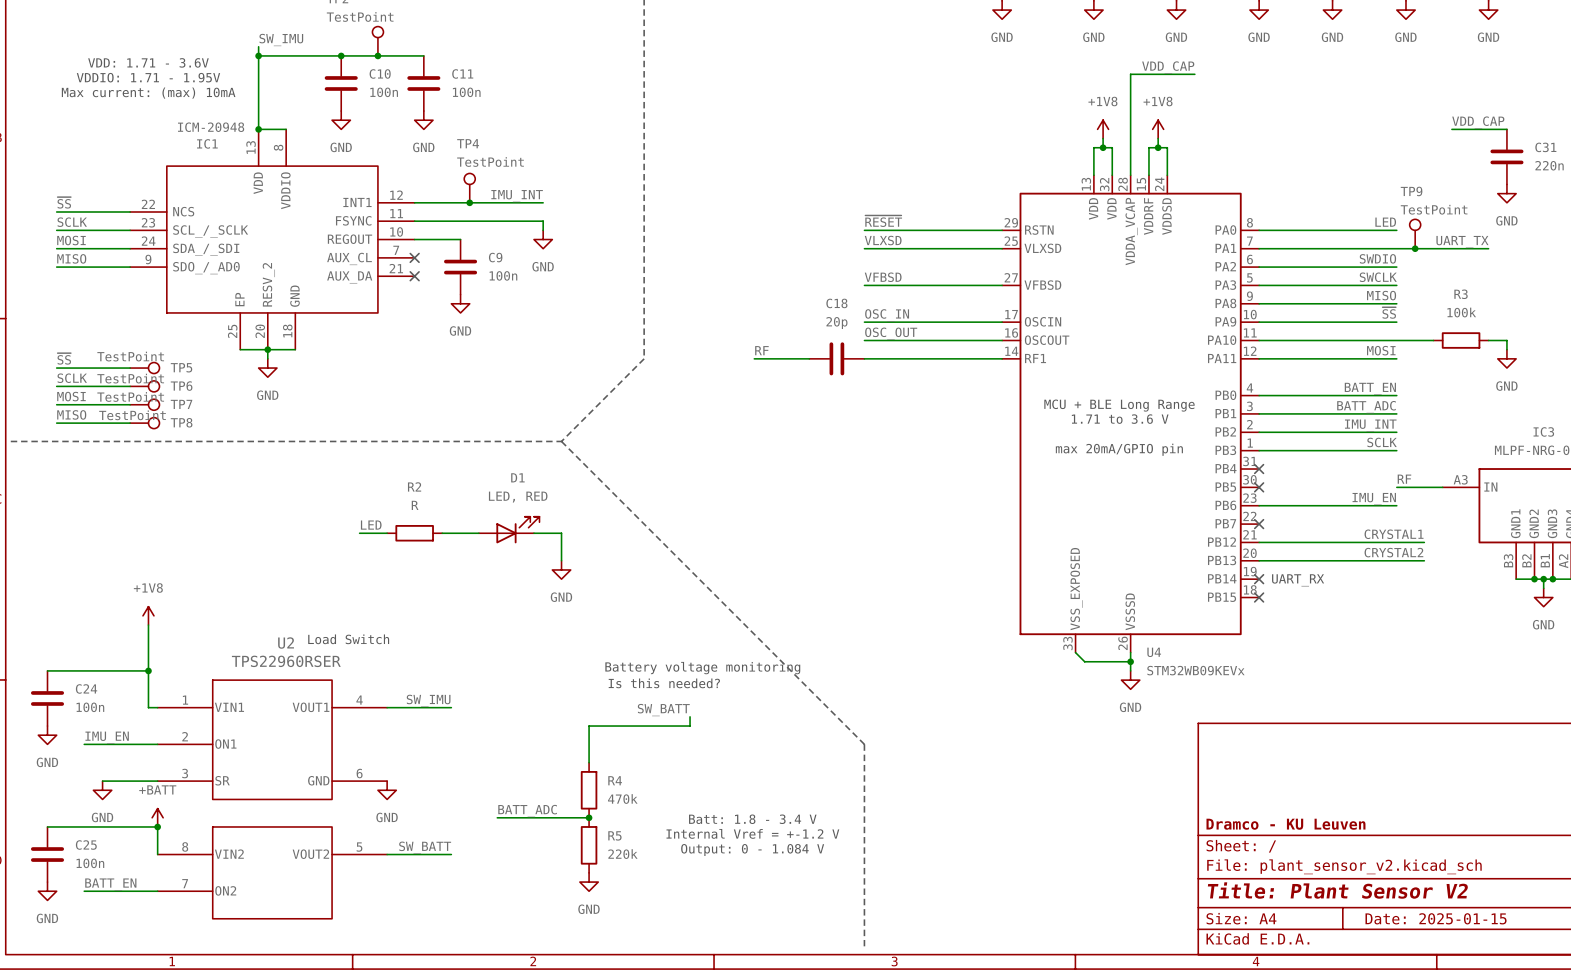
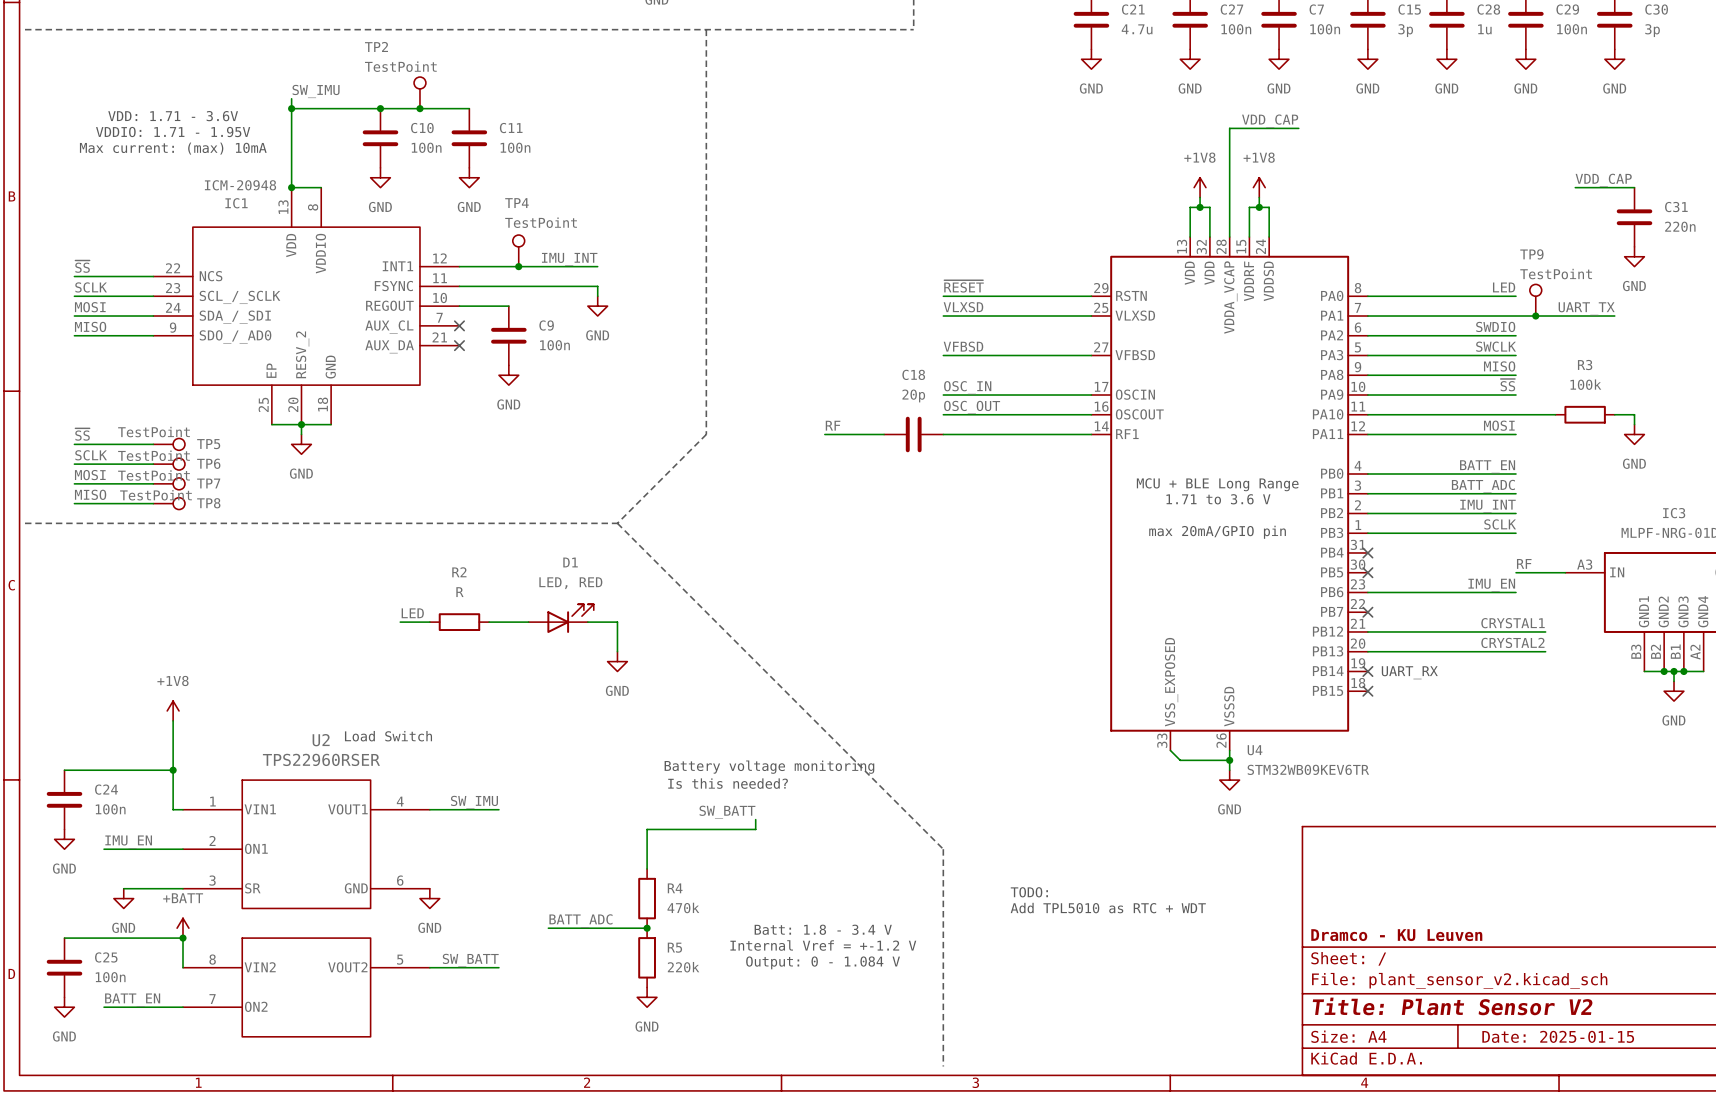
U4 value: STM32WB09KEVx (1195, 670) -> STM32WB09KEV6TR (1308, 769)
text: none -> TODO: (1029, 892)
text: none -> Add TPL5010 as RTC + WDT (1108, 908)

